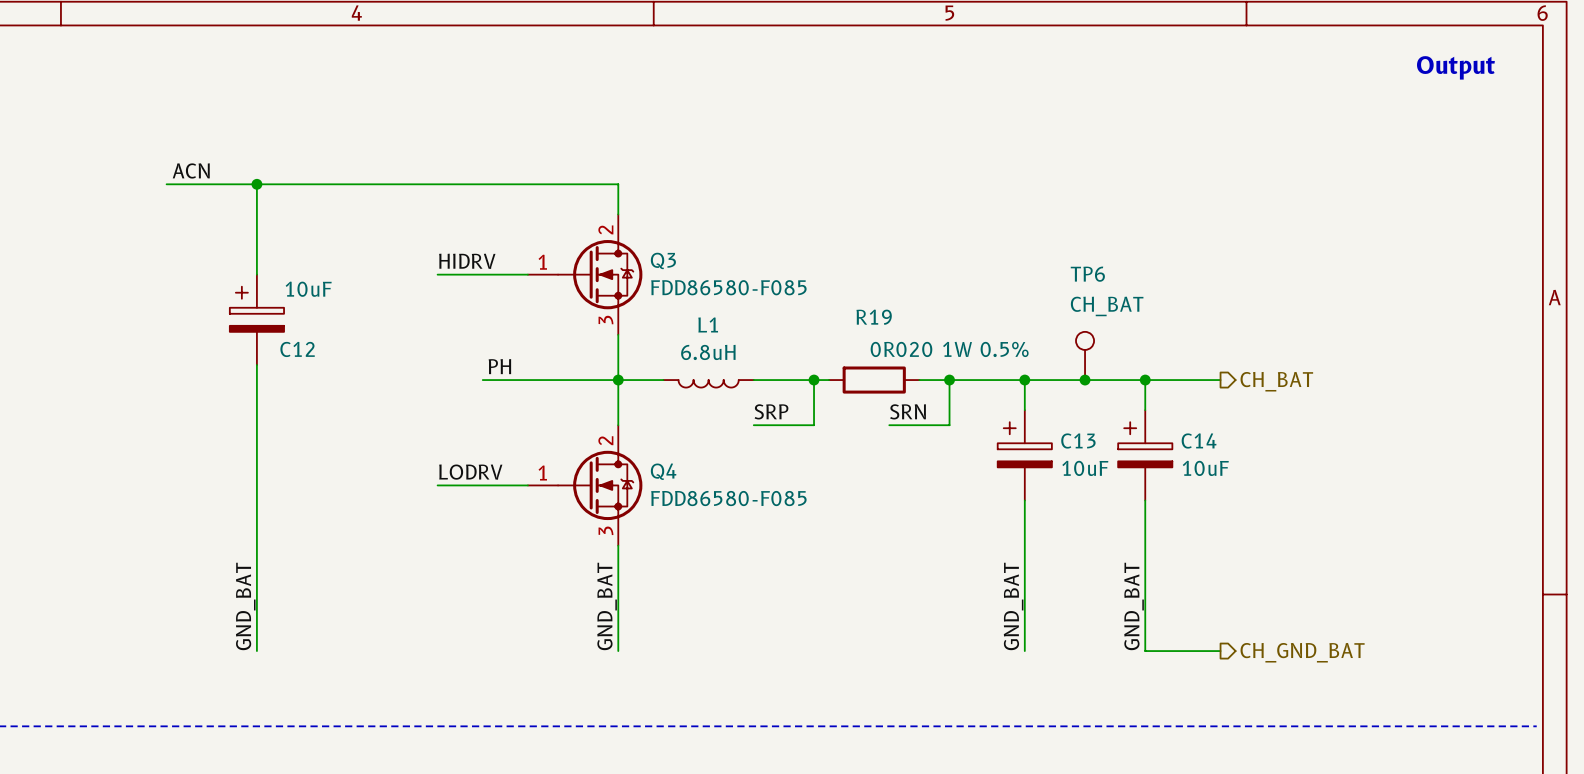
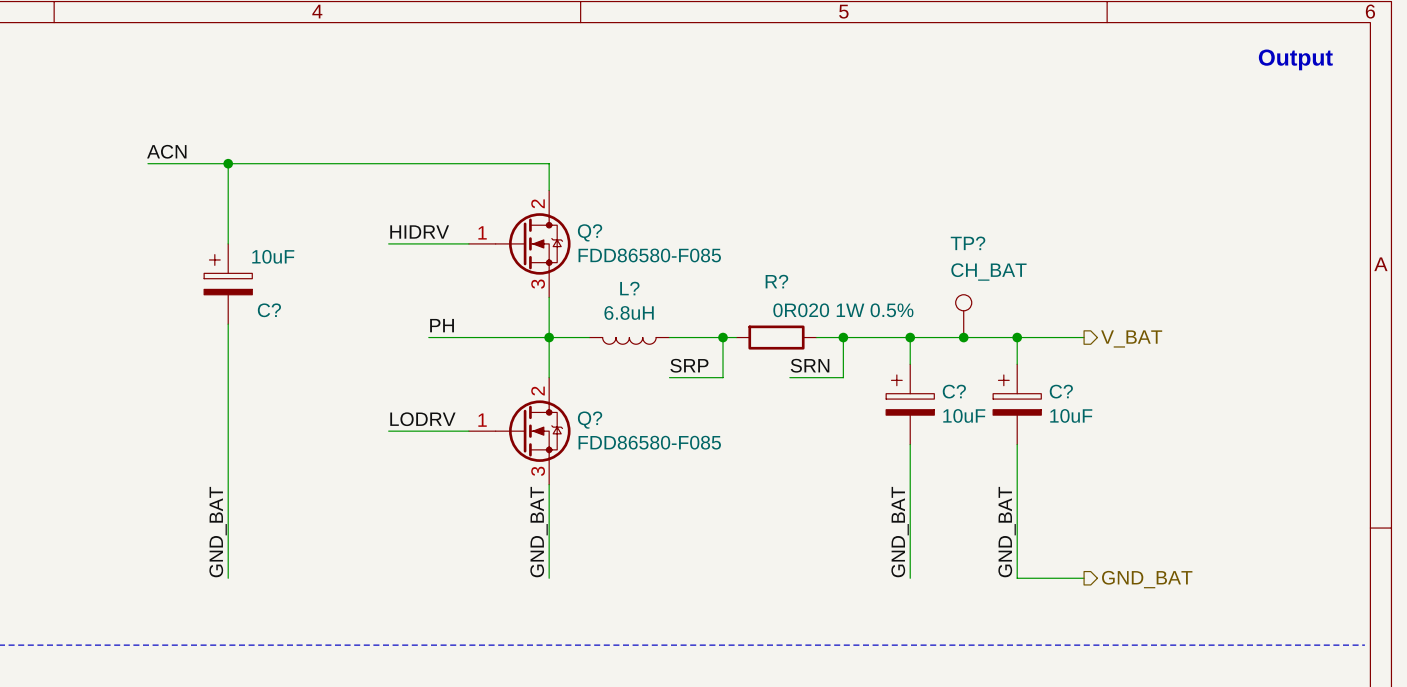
Q3 name: Q3 (663, 260) -> Q? (590, 232)
TP6 name: TP6 (1087, 274) -> TP? (968, 243)
R19 name: R19 (874, 317) -> R? (776, 281)
L1 name: L1 (708, 324) -> L? (629, 288)
C12 name: C12 (297, 349) -> C? (269, 310)
hierarchical label: CH_BAT (1276, 381) -> V_BAT (1131, 338)
C13 name: C13 (1078, 440) -> C? (954, 391)
C14 name: C14 (1199, 440) -> C? (1061, 391)
Q4 name: Q4 (663, 471) -> Q? (590, 420)
hierarchical label: CH_GND_BAT (1302, 652) -> GND_BAT (1147, 579)

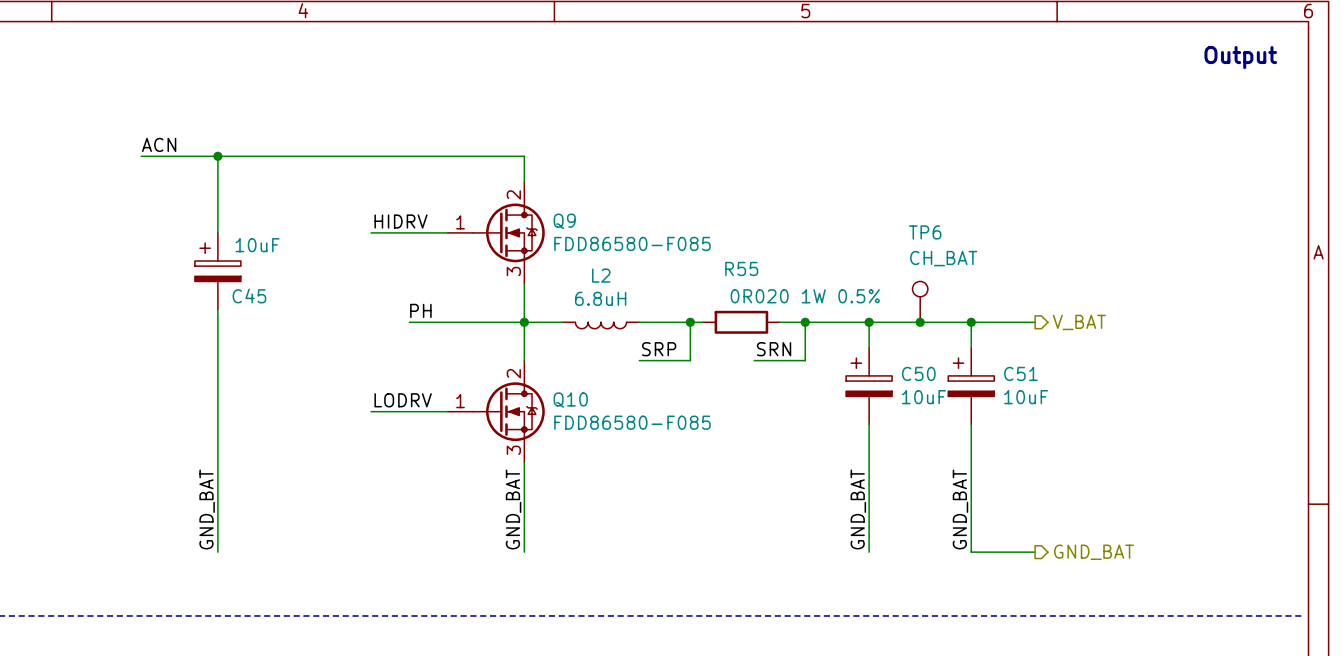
Q? name: Q? (590, 232) -> Q9 (564, 221)
TP? name: TP? (968, 243) -> TP6 (925, 232)
R? name: R? (776, 281) -> R55 (741, 268)
L? name: L? (629, 288) -> L2 (601, 275)
C? name: C? (269, 310) -> C45 (249, 295)
C? name: C? (954, 391) -> C50 (918, 373)
C? name: C? (1061, 391) -> C51 (1020, 373)
Q? name: Q? (590, 420) -> Q10 (570, 400)

